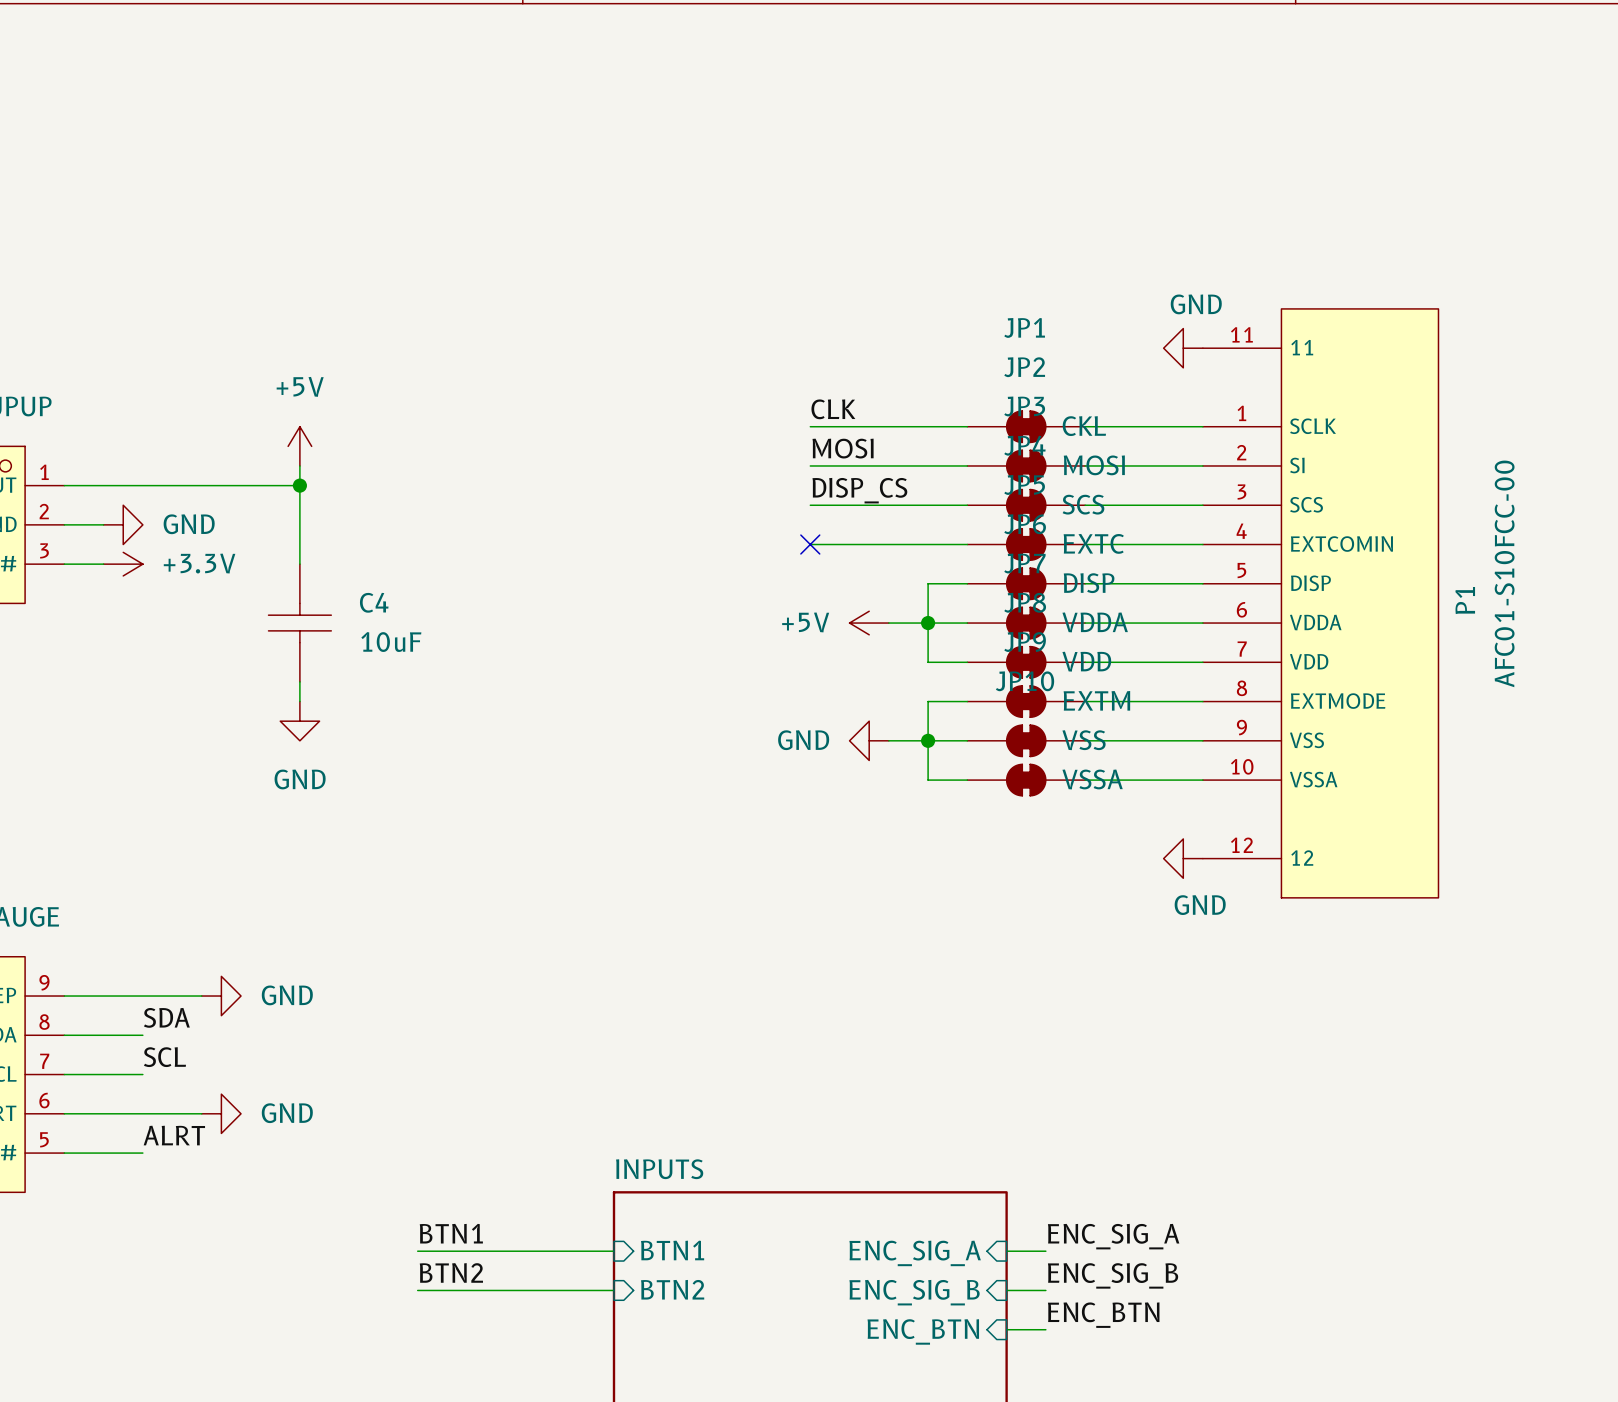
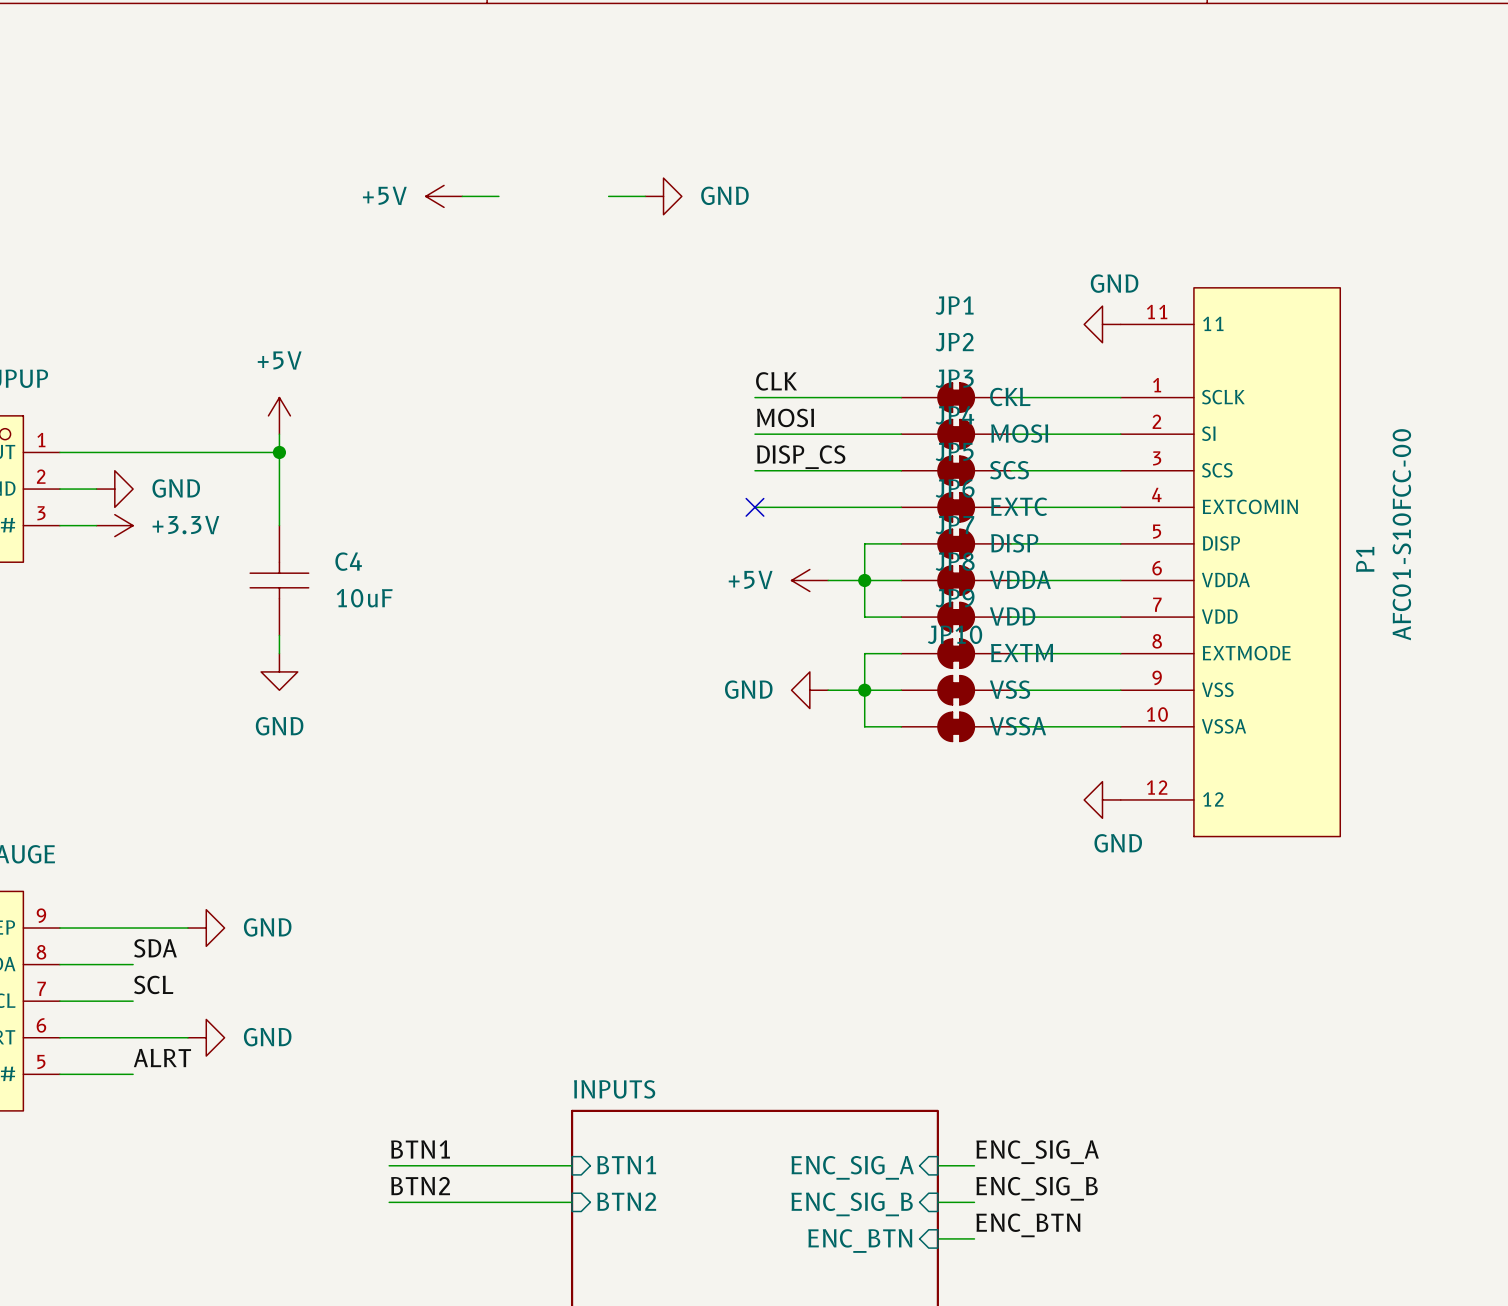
power symbol: none -> +5V (444, 196)
wire: none -> (462, 196) (498, 196)
wire: none -> (608, 196) (645, 196)
power symbol: none -> GND (663, 196)

